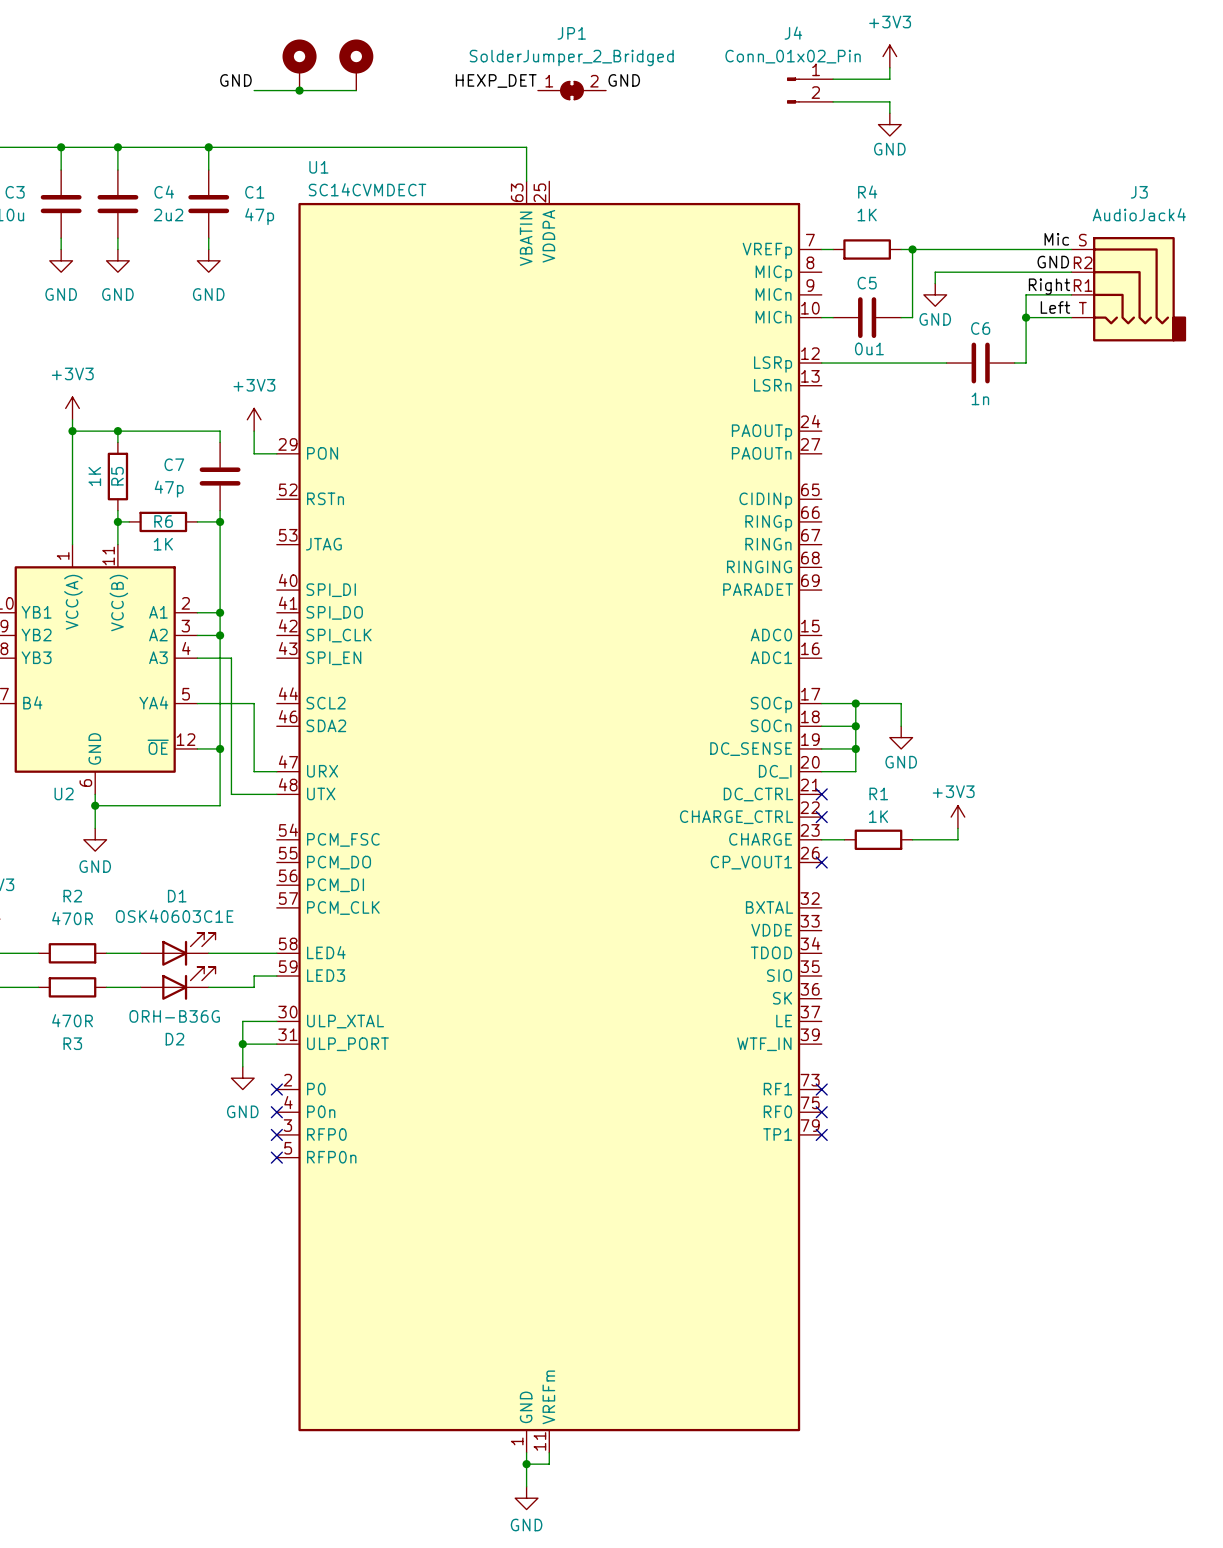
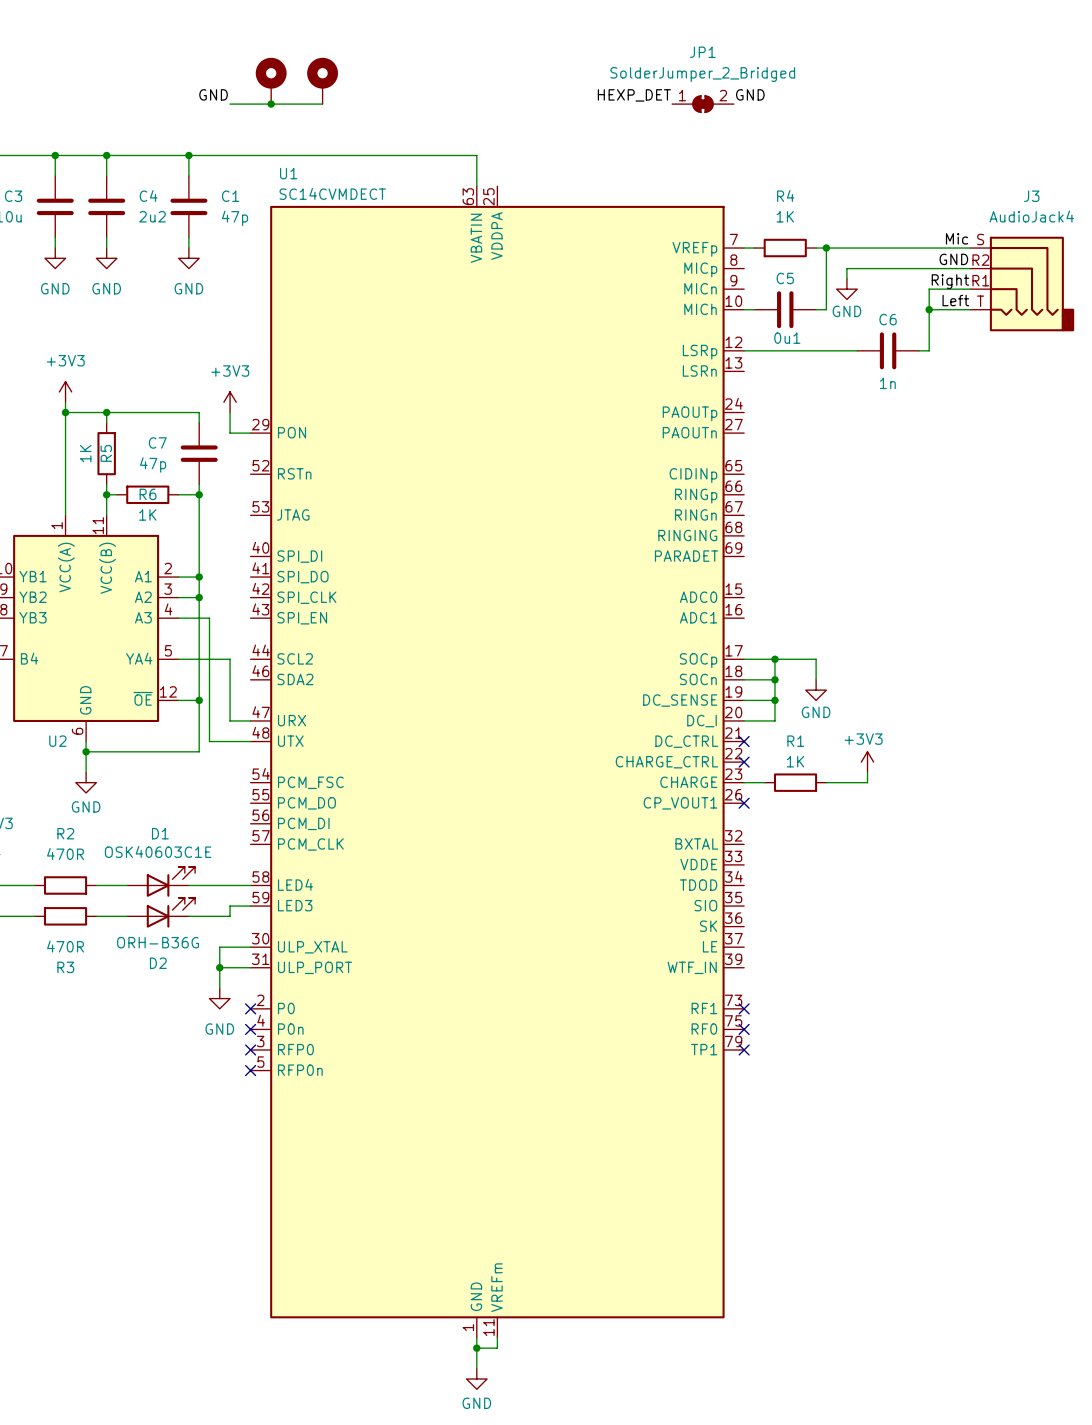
power symbol: +3V3 (889, 56) -> none
wire: (889, 67) (889, 79) (833, 79) -> none
label position: HEXP_DET (496, 80) -> HEXP_DET (634, 95)
label position: GND (624, 80) -> GND (750, 94)
JP1 position: (571, 90) -> (703, 104)
J4: Conn_01x02_Pin (810, 90) -> none
wire: (833, 101) (889, 101) (889, 113) -> none
power symbol: GND (889, 124) -> none

